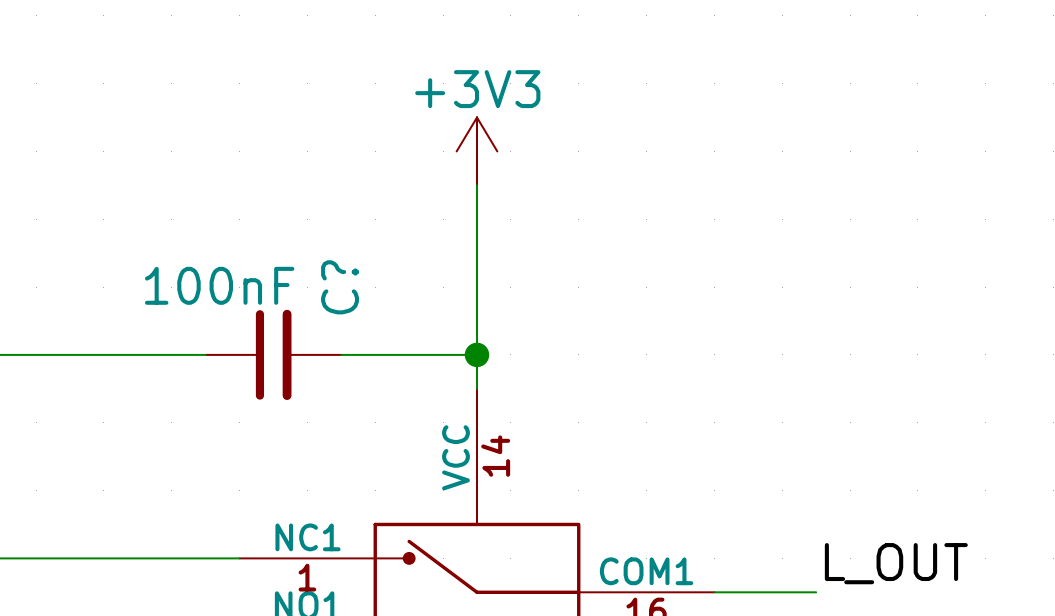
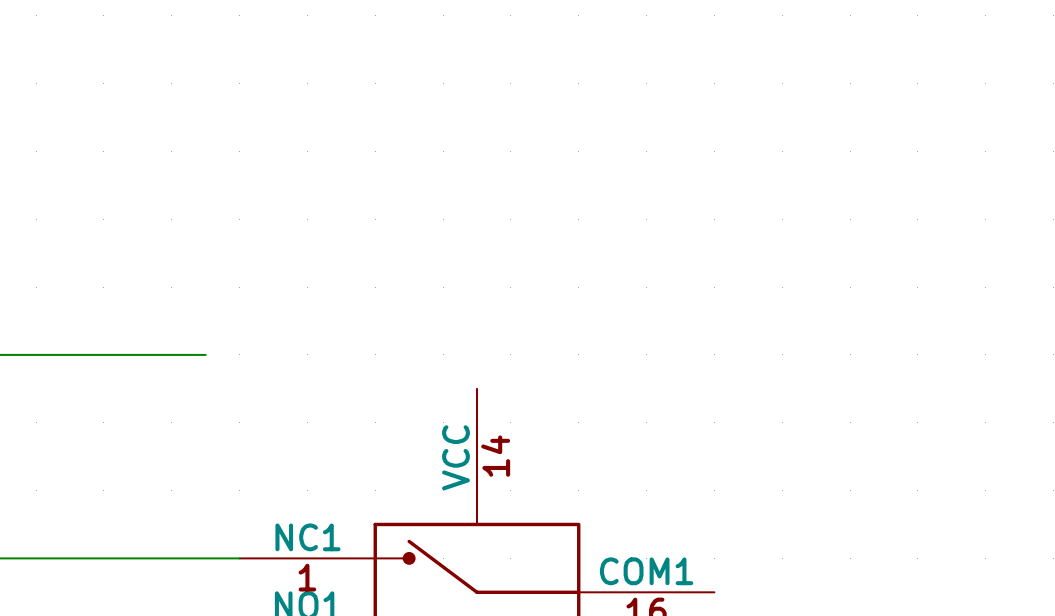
power symbol: +3V3 (476, 151) -> none
wire: (476, 185) (476, 388) -> none
C?: 100nF (273, 354) -> none
wire: (341, 354) (476, 354) -> none
junction: (476, 354) -> none
label: L_OUT (896, 563) -> none
wire: (714, 592) (816, 592) -> none

